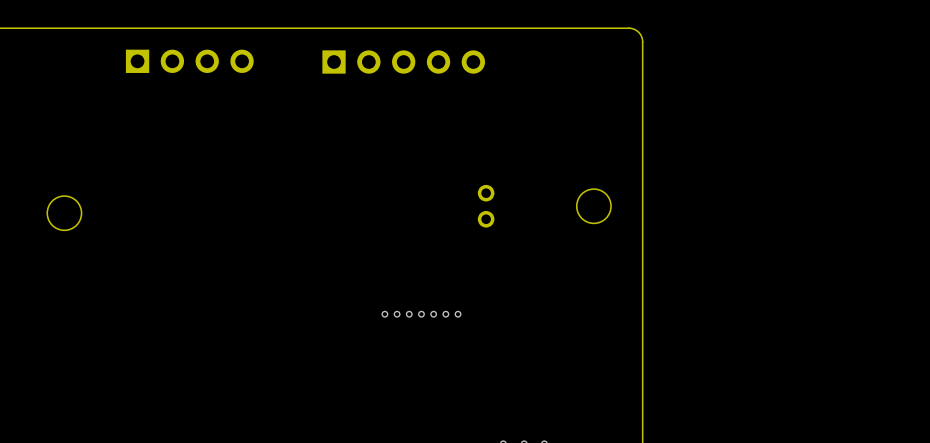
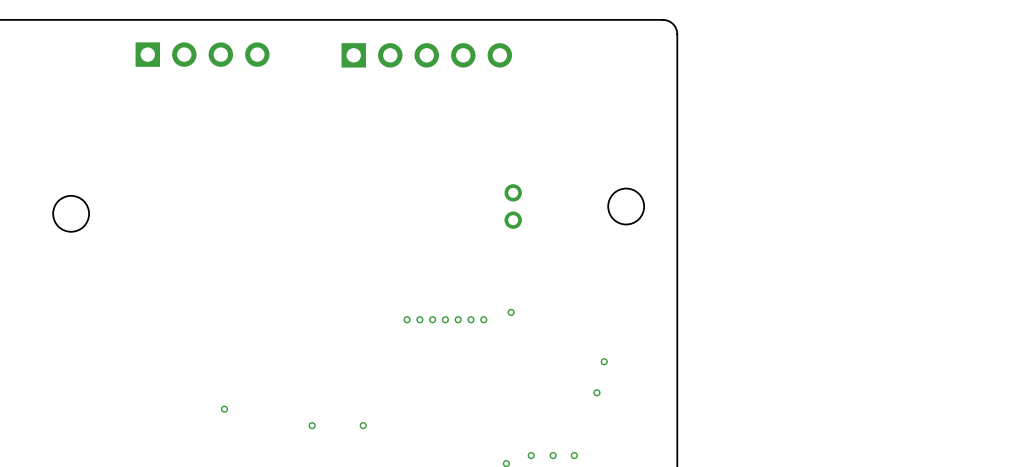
via: none -> (511, 312)
via: none -> (604, 361)
via: none -> (596, 392)
via: none -> (224, 409)
via: none -> (312, 425)
via: none -> (363, 425)

